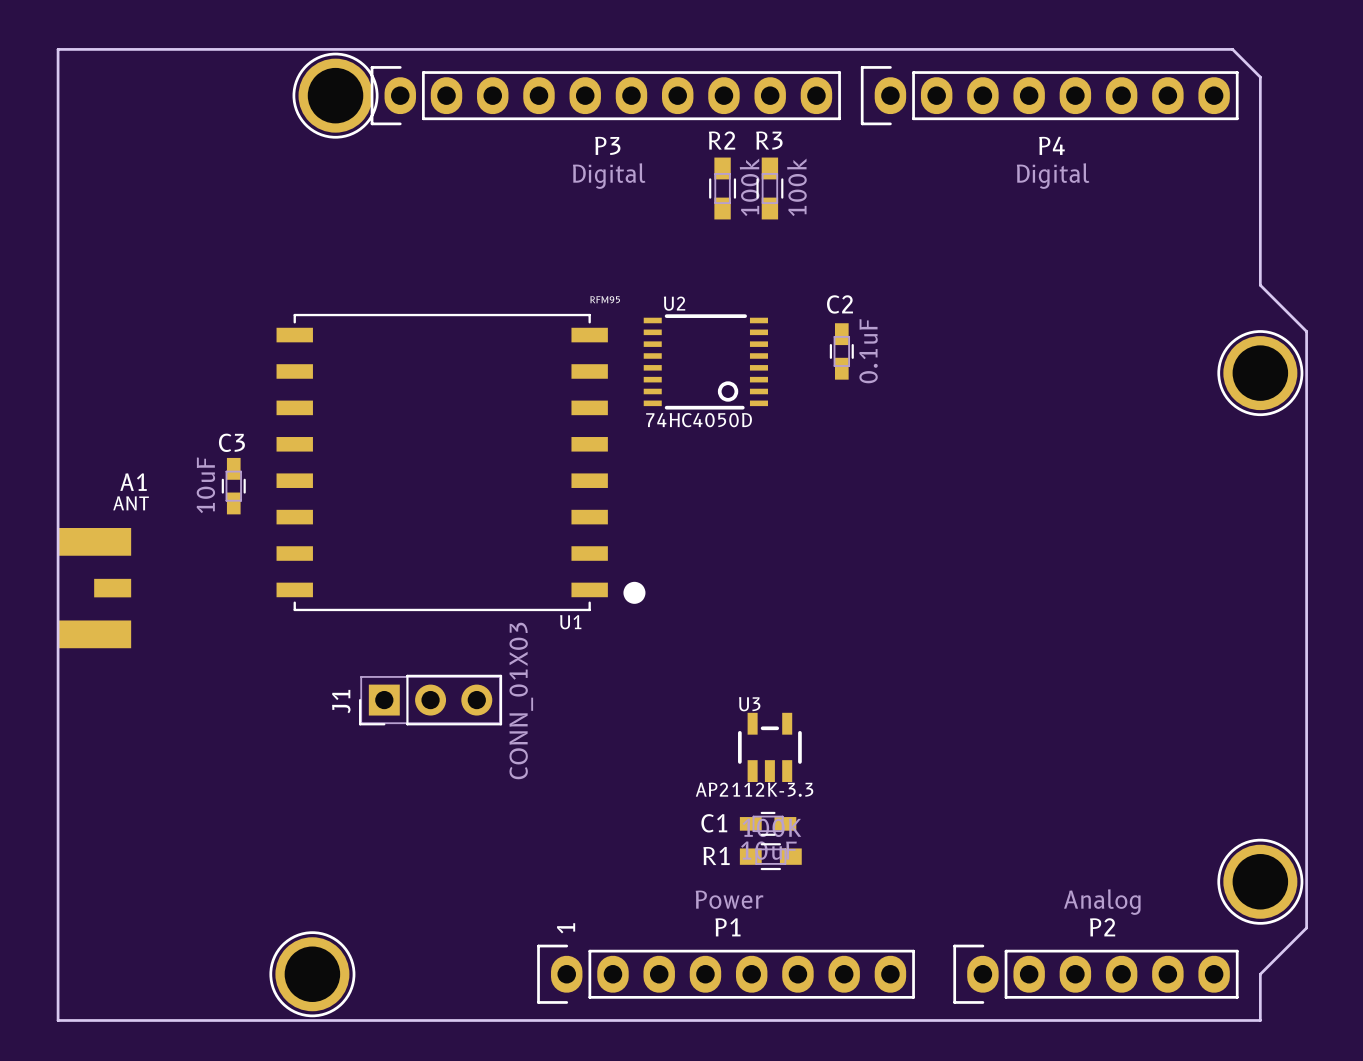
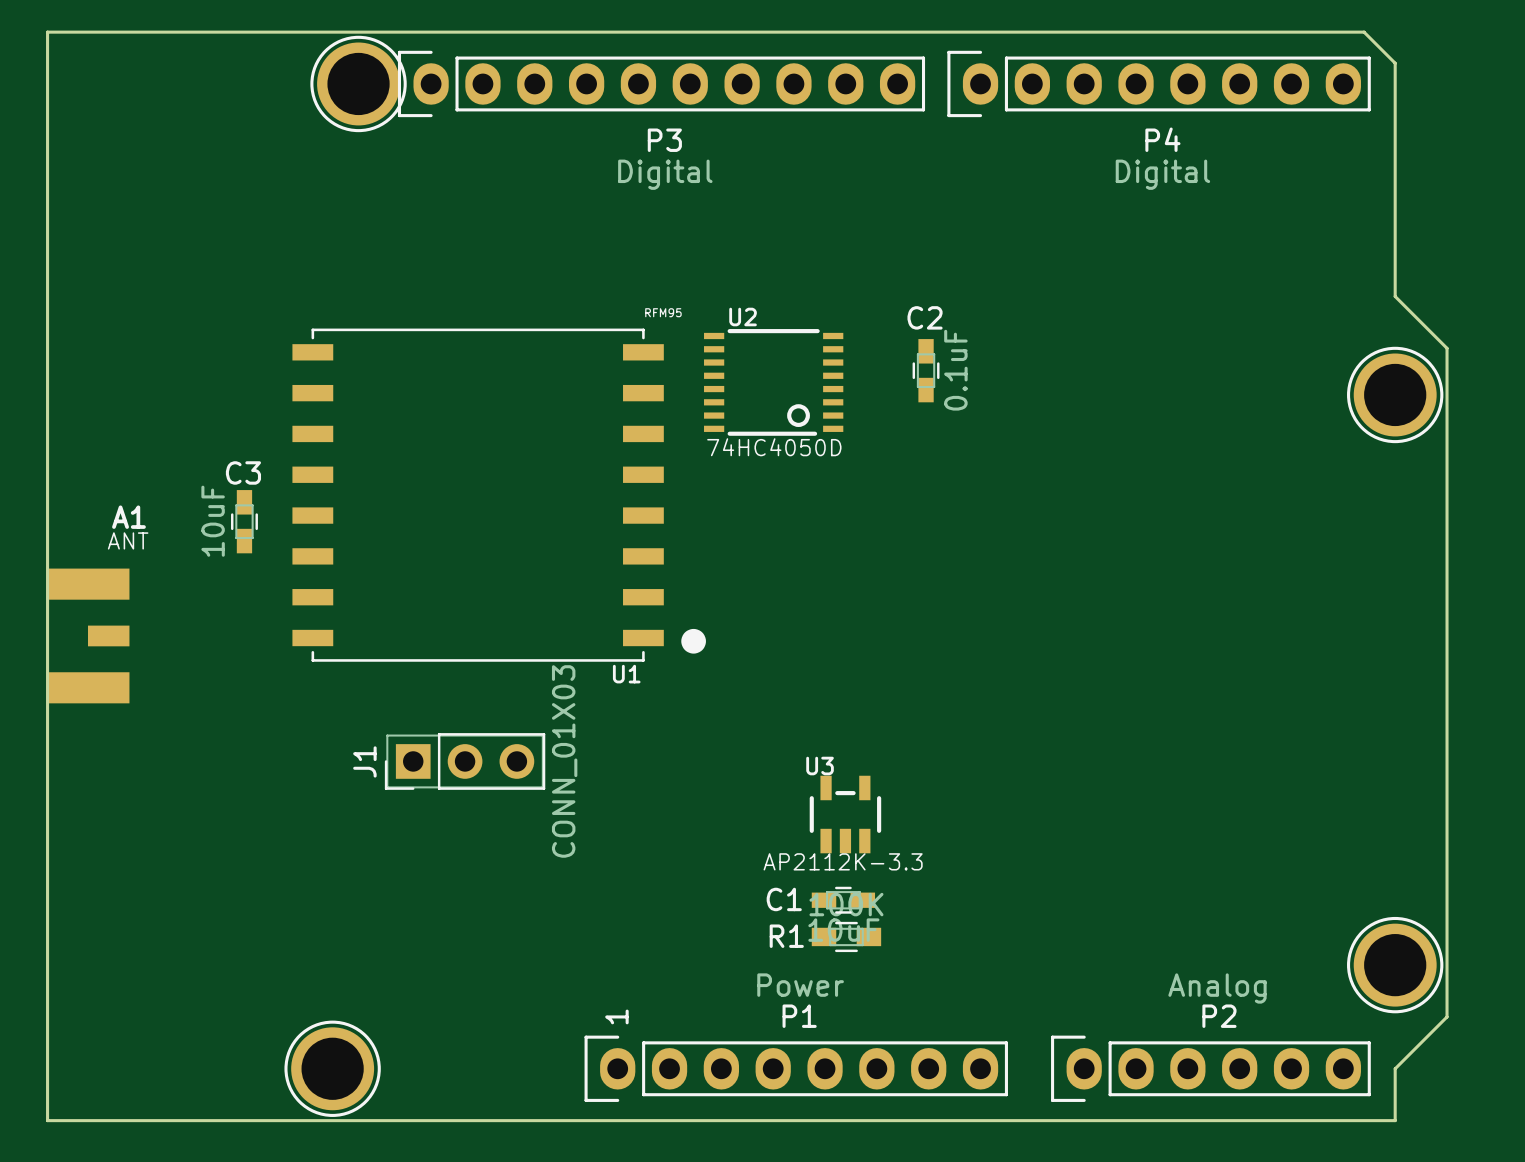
R2: 100k (722, 188) -> none
R3: 100k (769, 188) -> none

